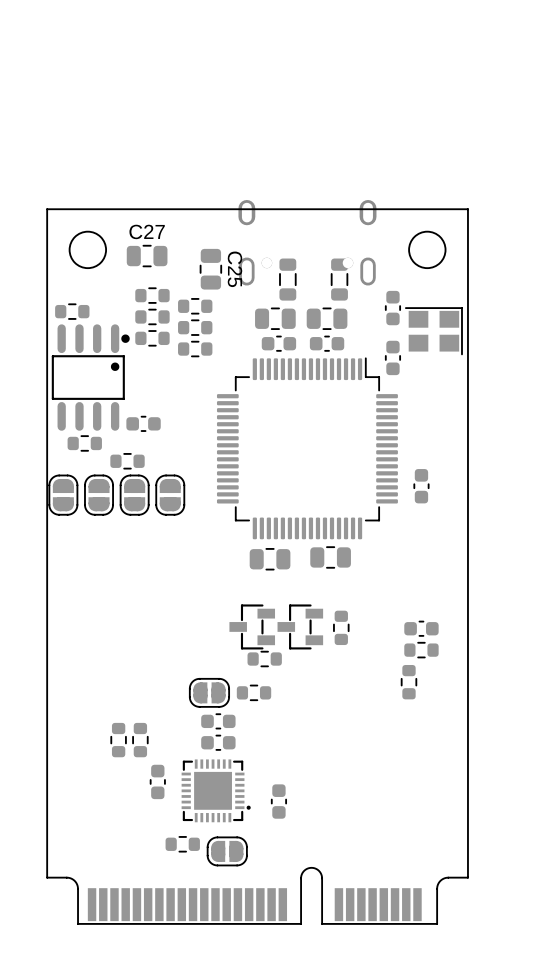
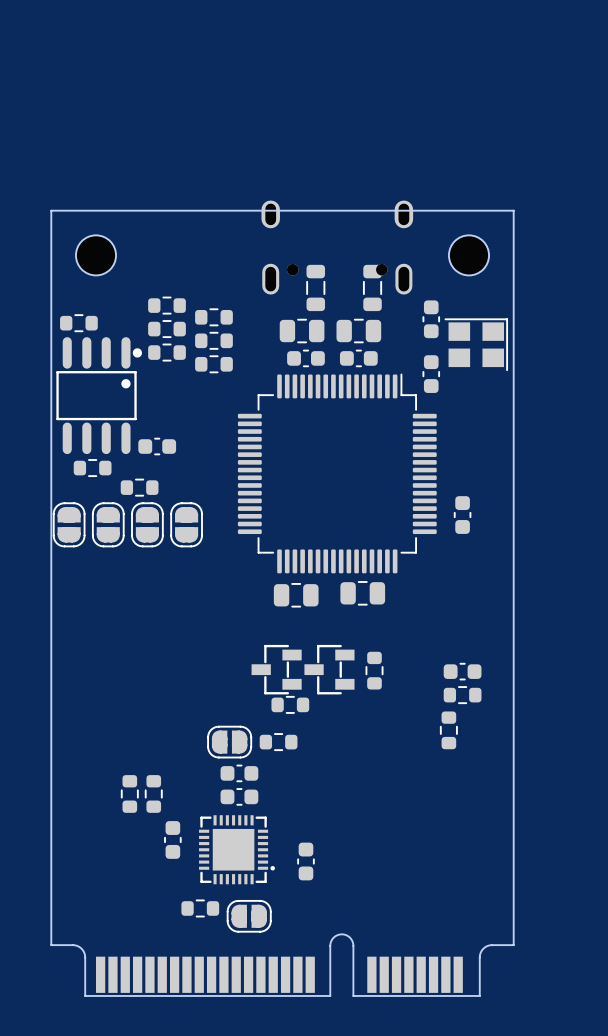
C27: (147, 256) -> none
C25: (210, 269) -> none

